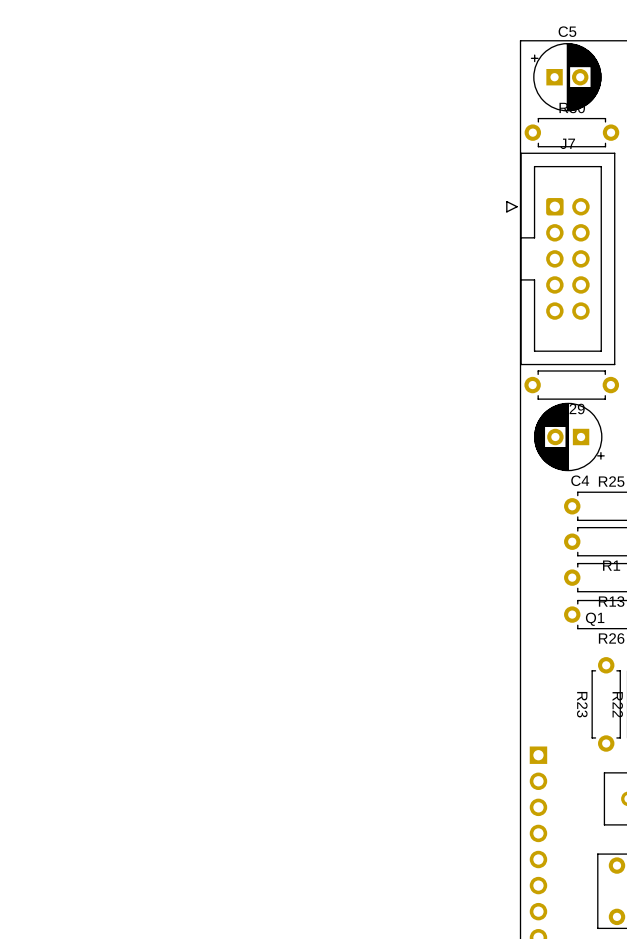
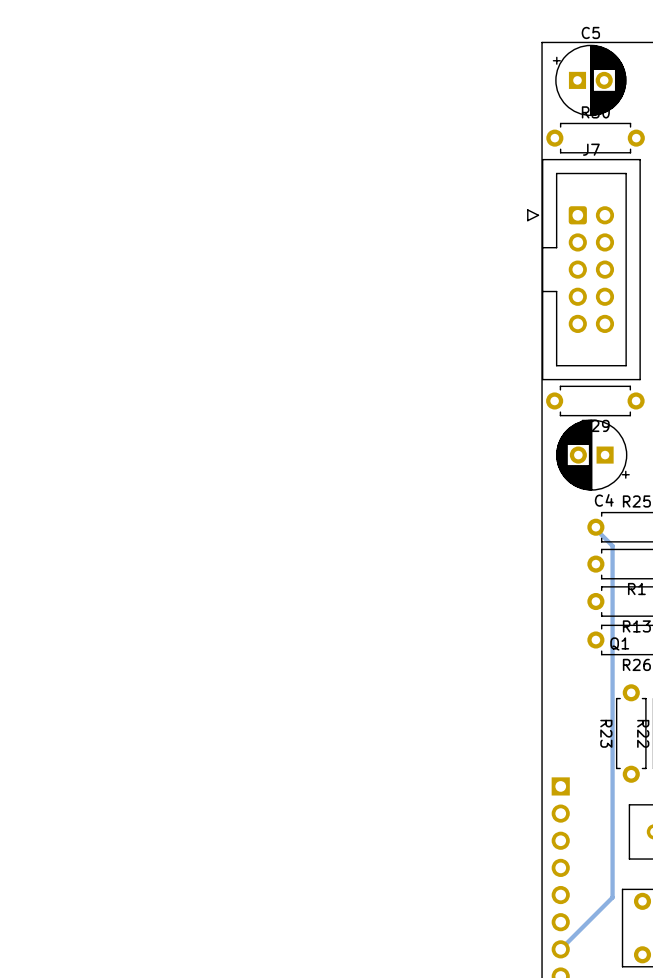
track: none -> (593, 526) (612, 545) (612, 897) (560, 949)

